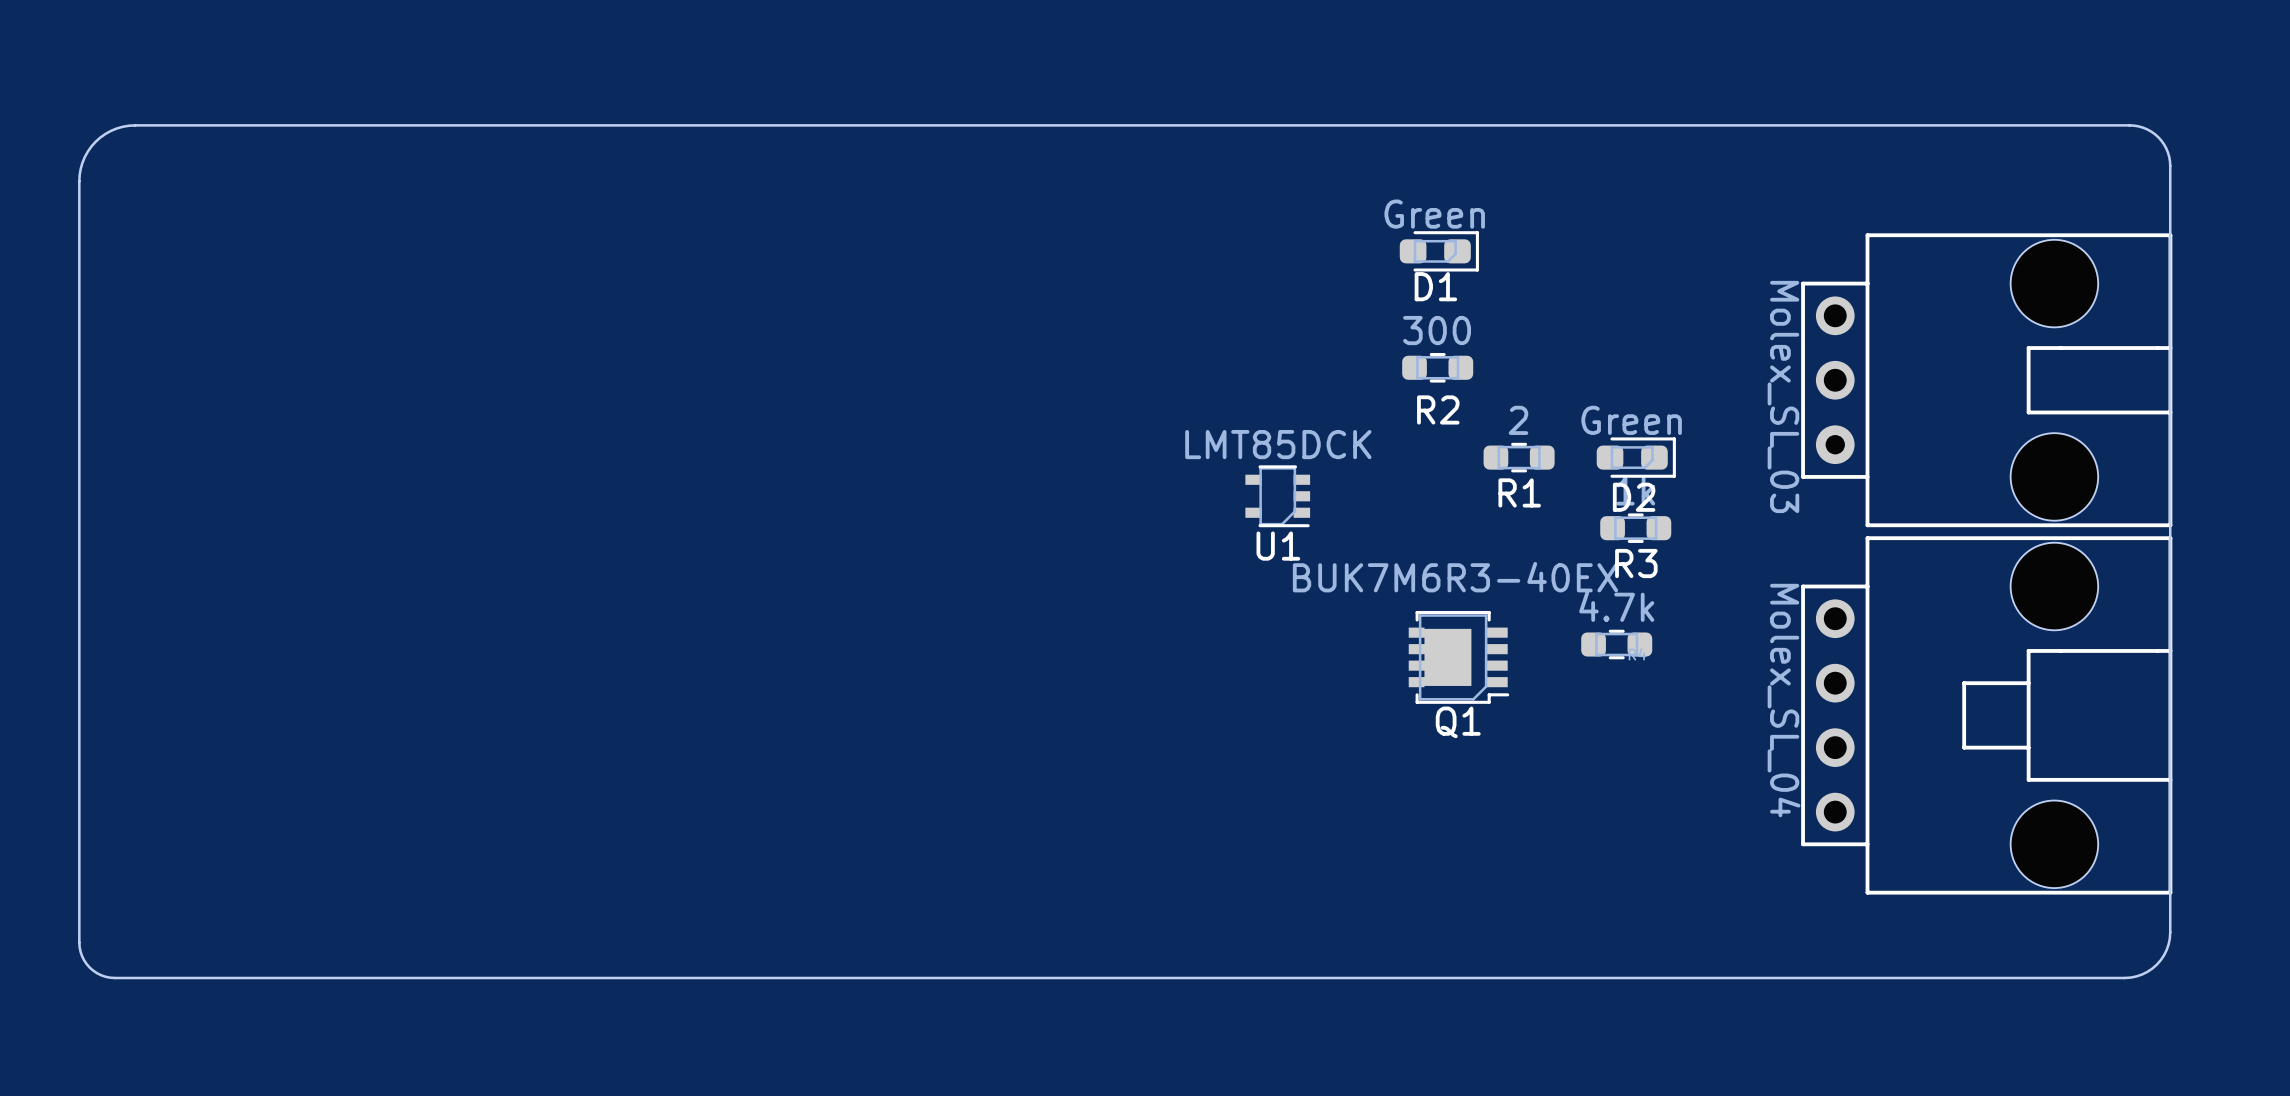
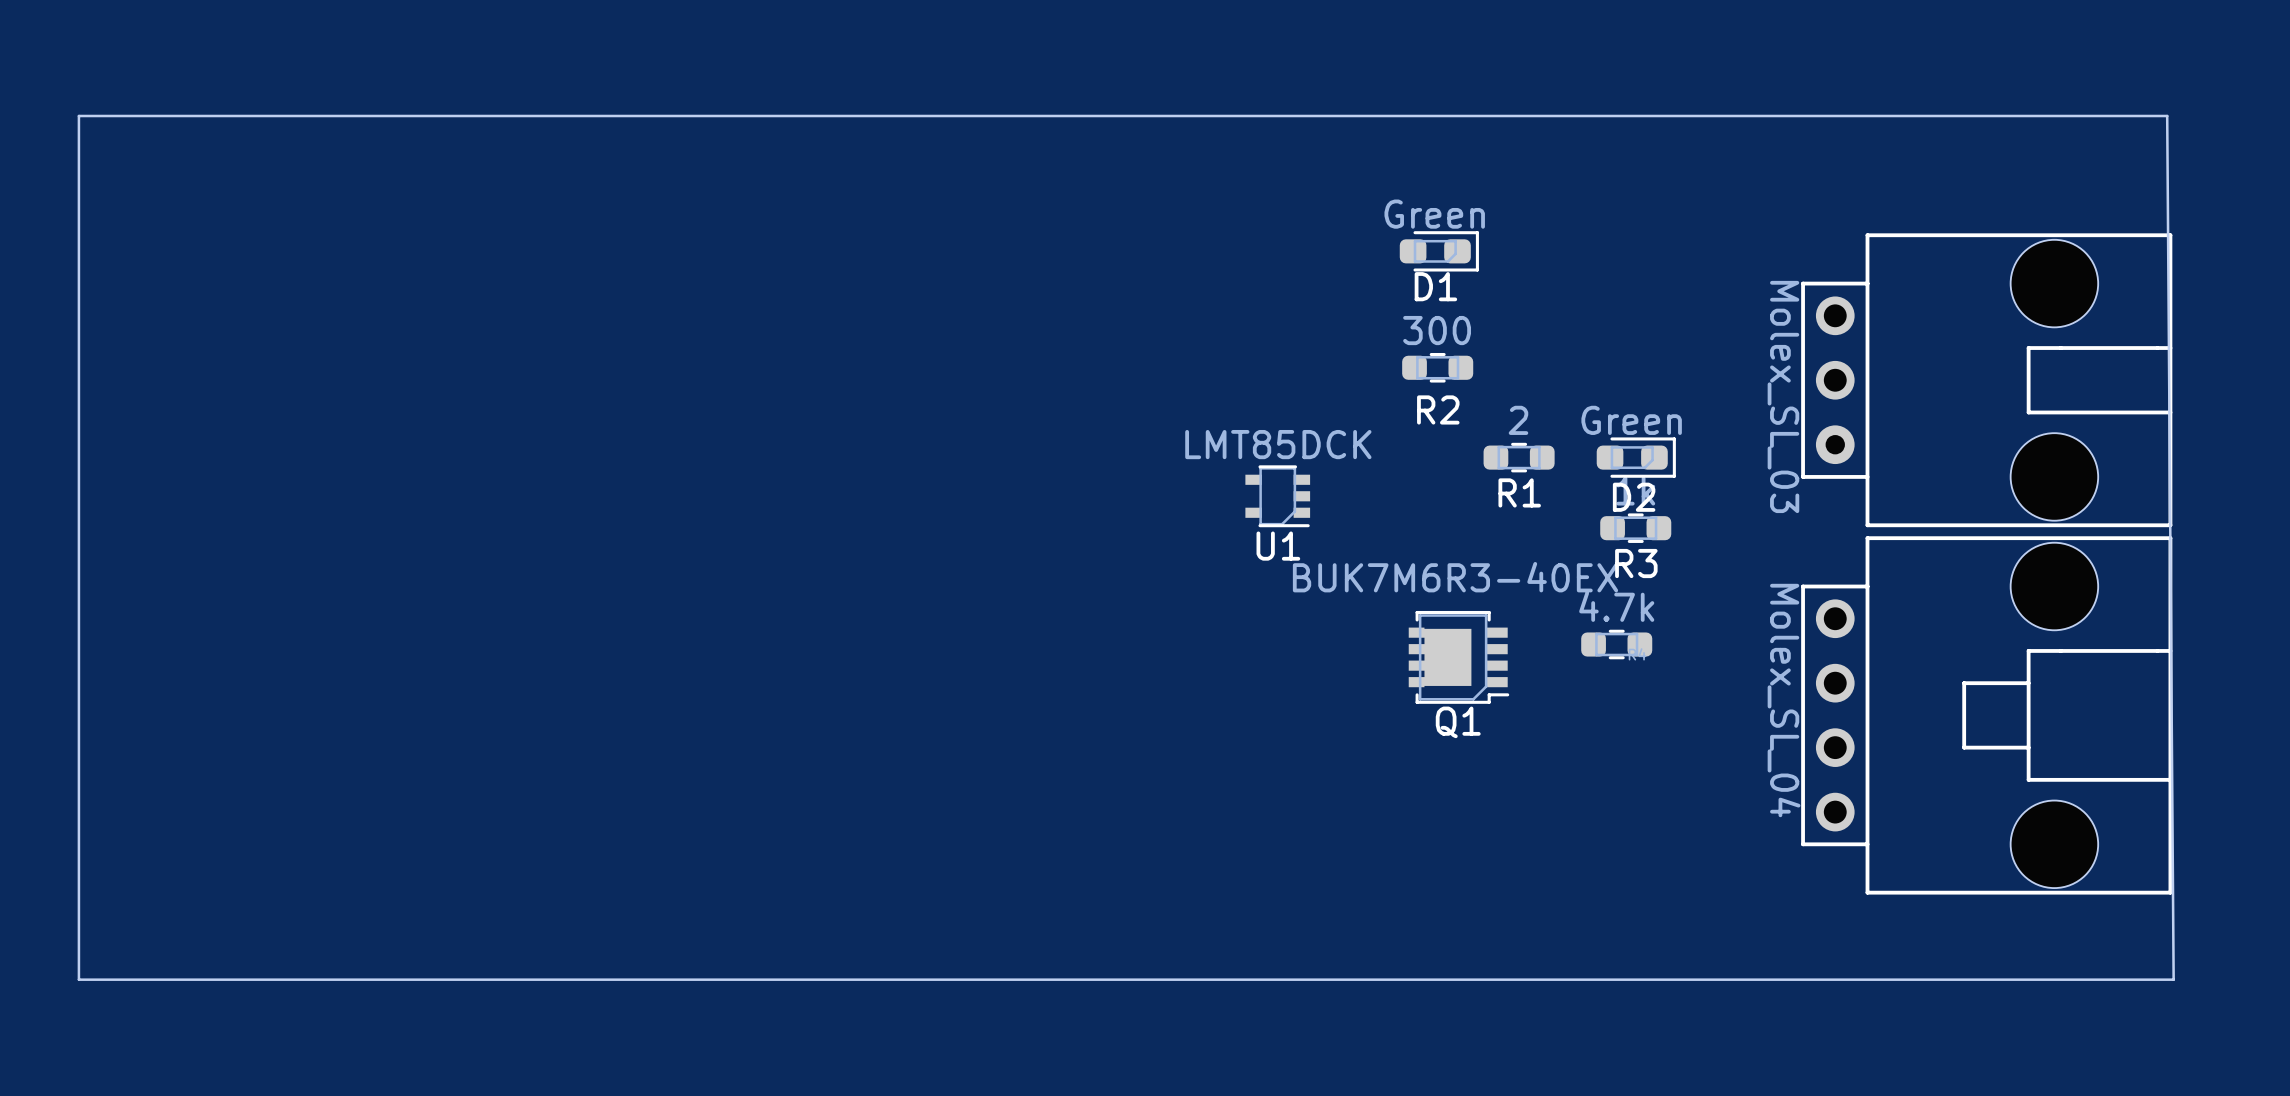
board edge: (2129, 125) (135, 125) (116, 128) (100, 137) (87, 151) (80, 168) (79, 181) (79, 942) (82, 956) (89, 967) (97, 973) (114, 977) (2124, 977) (2142, 974) (2152, 968) (2160, 960) (2166, 949) (2170, 932) (2170, 165) (2166, 148) (2158, 137) (2147, 129) (2129, 125) -> (2167, 116) (2173, 979) (78, 979) (78, 116) (2167, 116)

